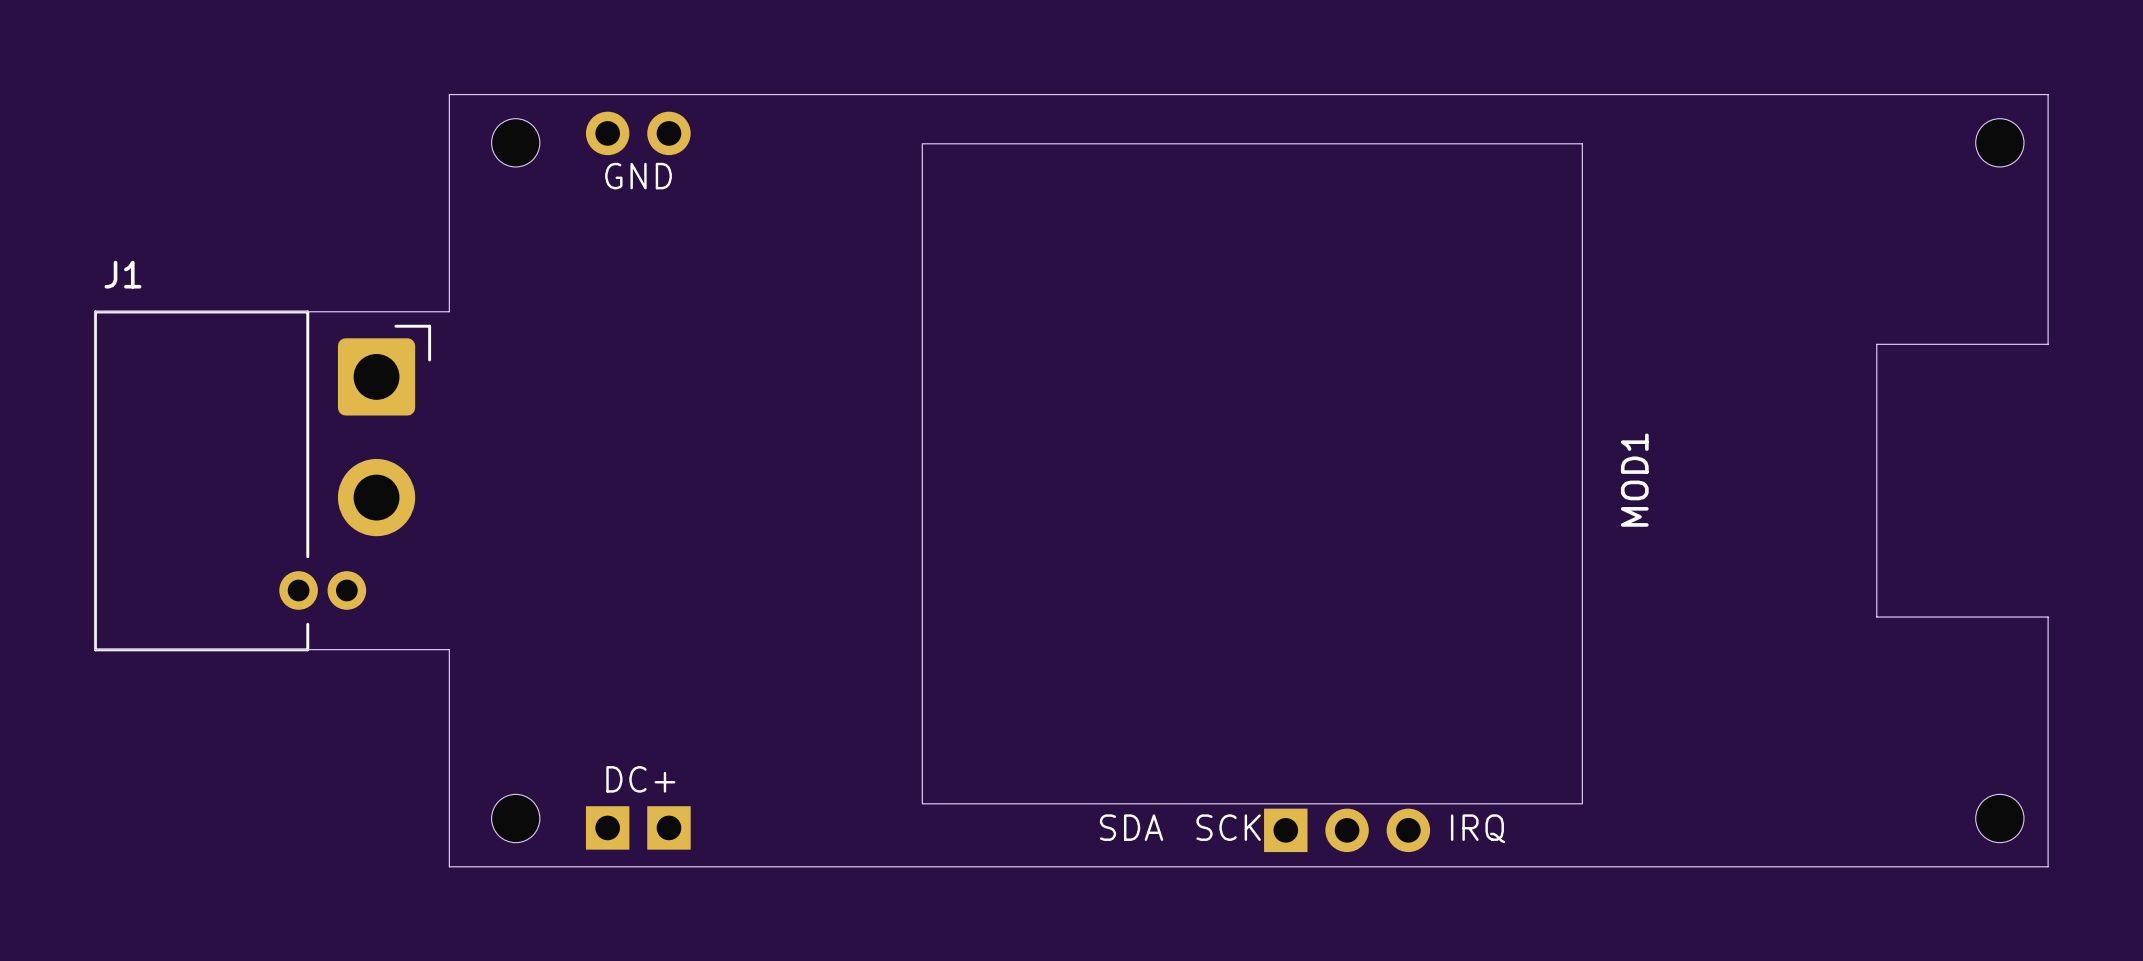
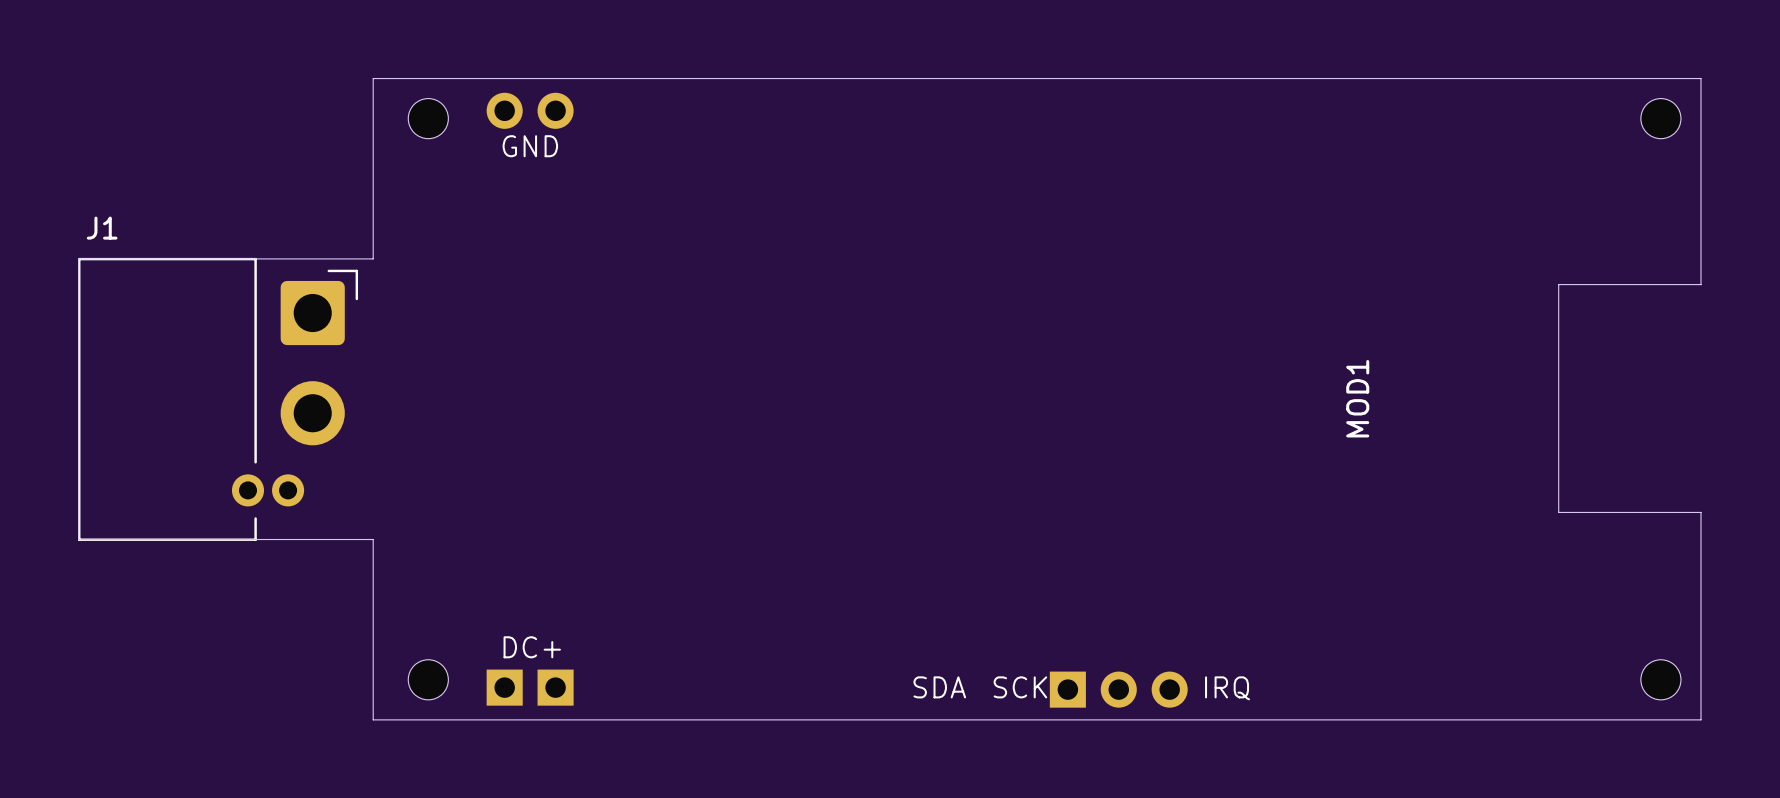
MOD1 footprint: [491, 111, 2049, 853] -> [408, 92, 1681, 708]
board edge: (2048, 342) (2048, 344) -> (1701, 284) (1558, 284) (1558, 512) (1701, 512)

